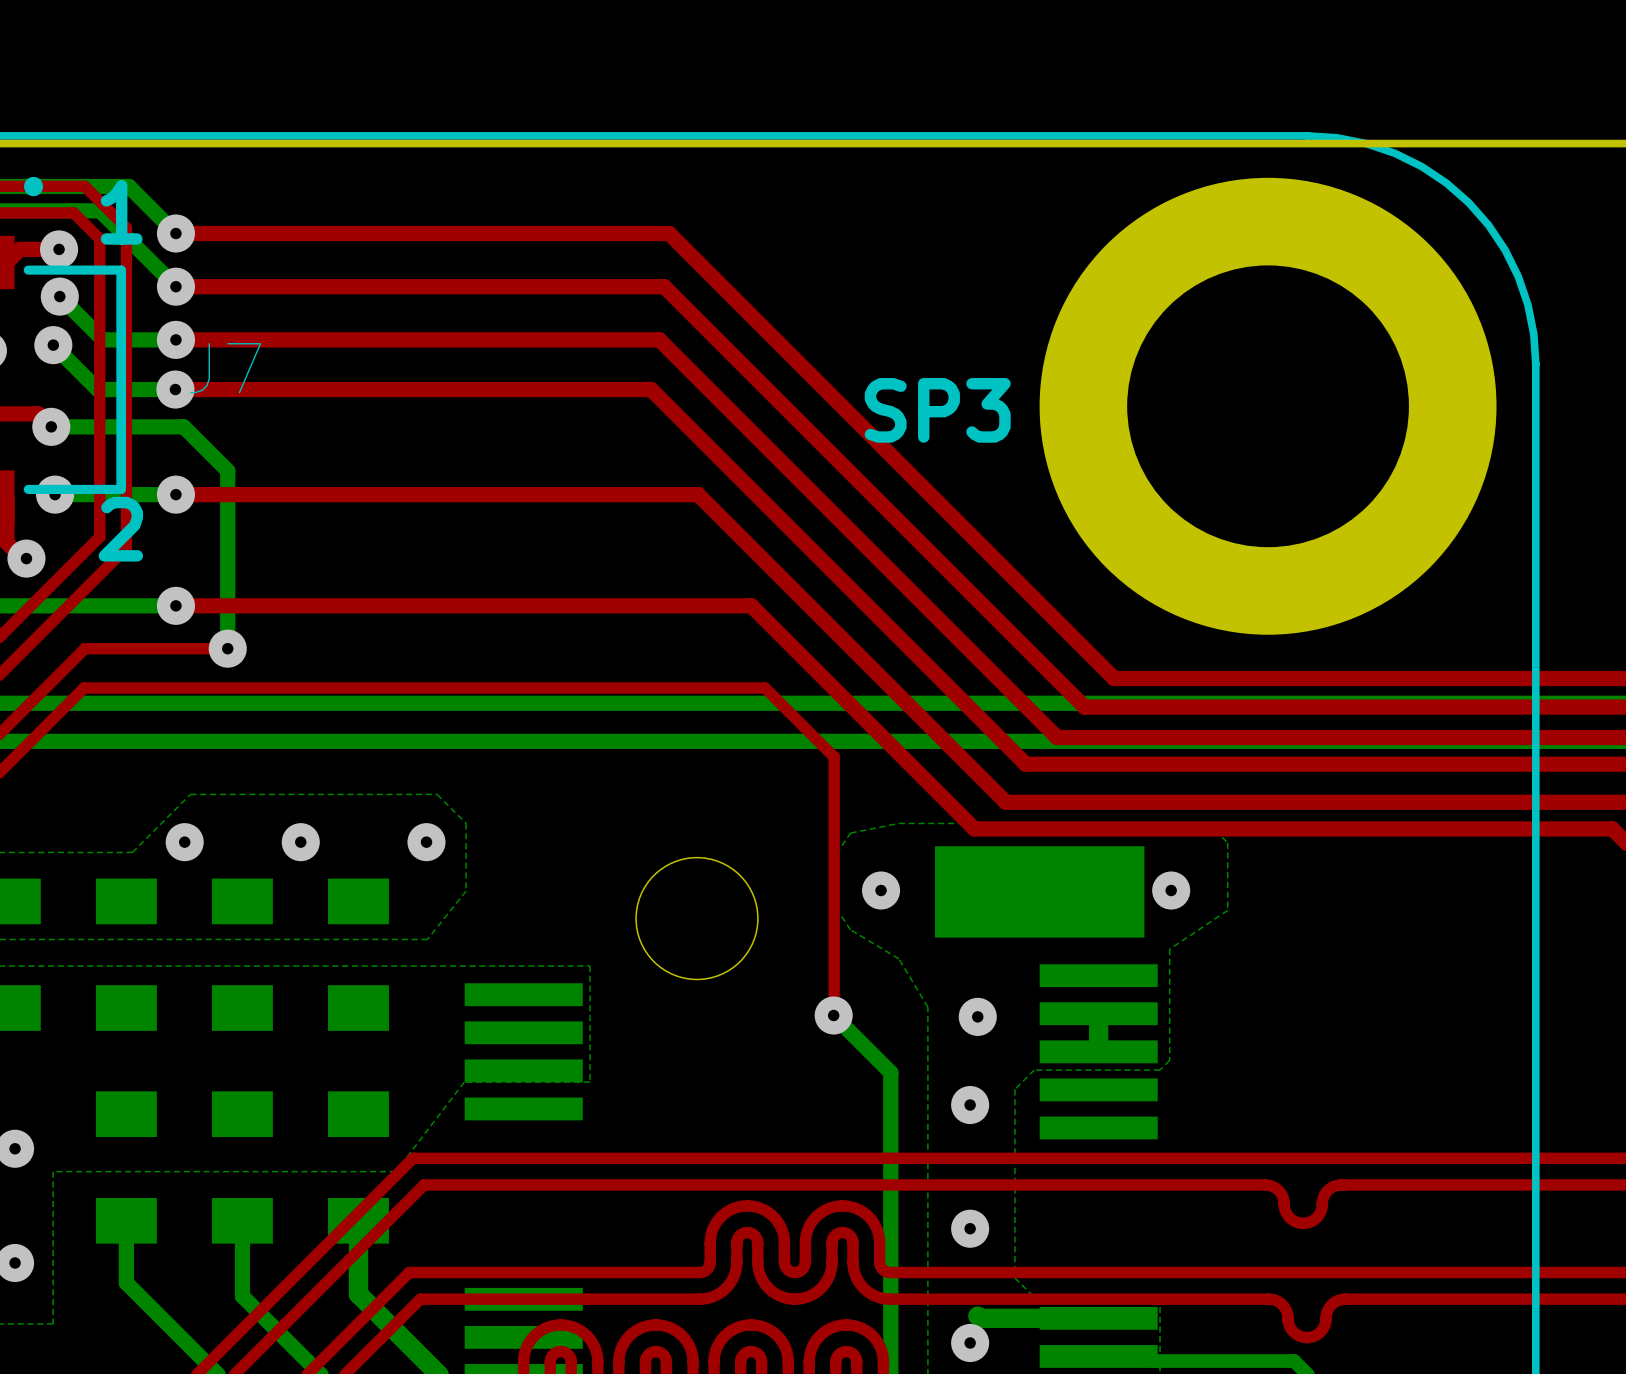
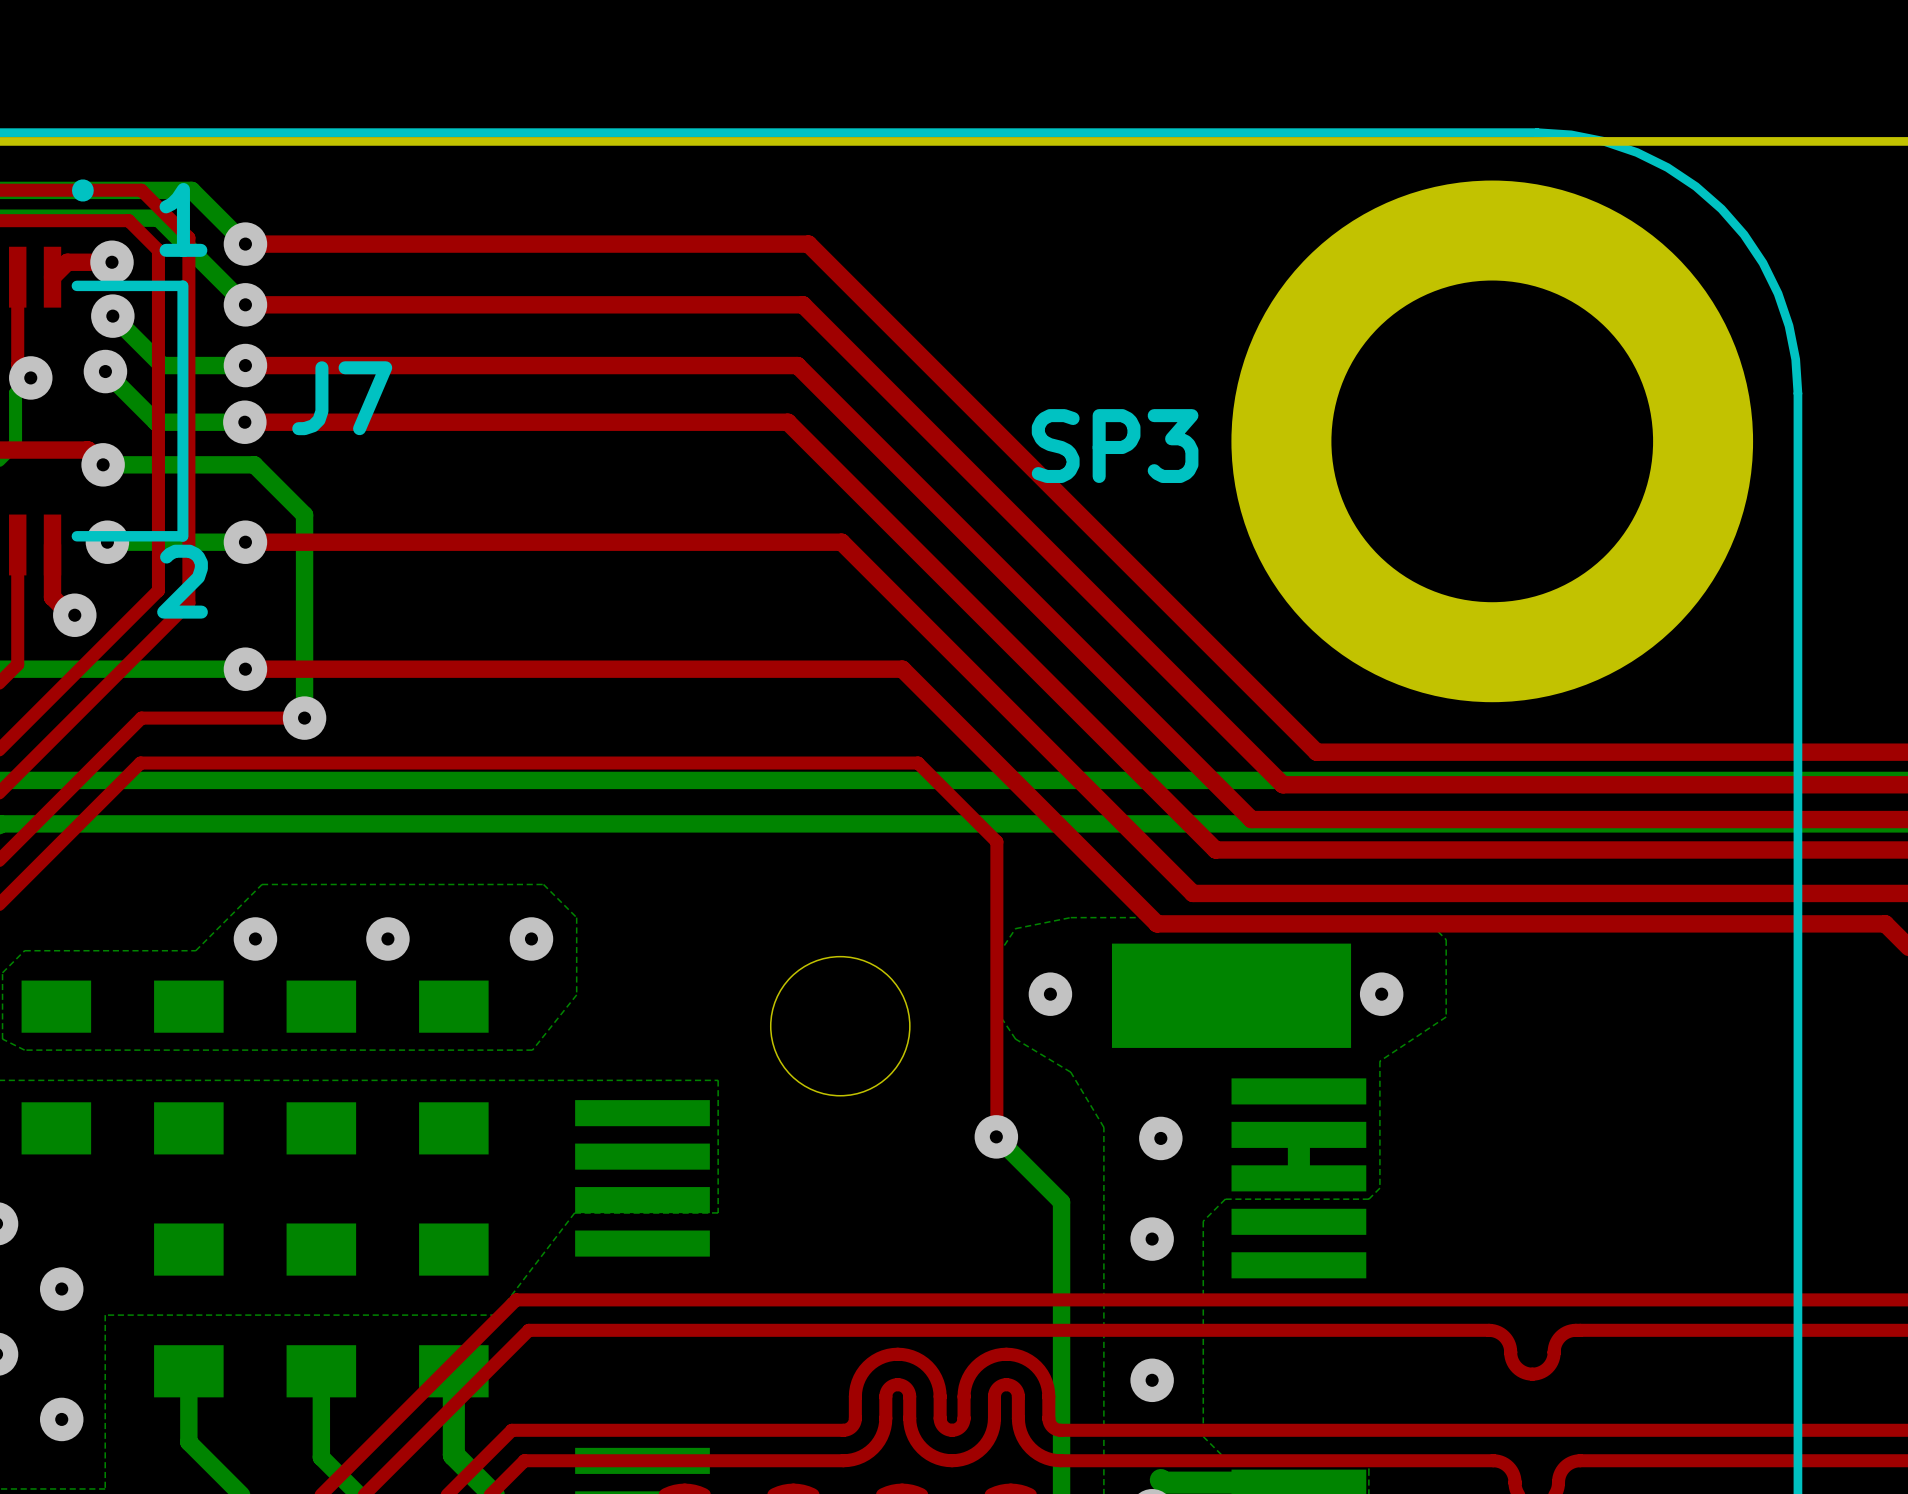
J7 name position: J7 (225, 368) -> J7 (342, 398)

